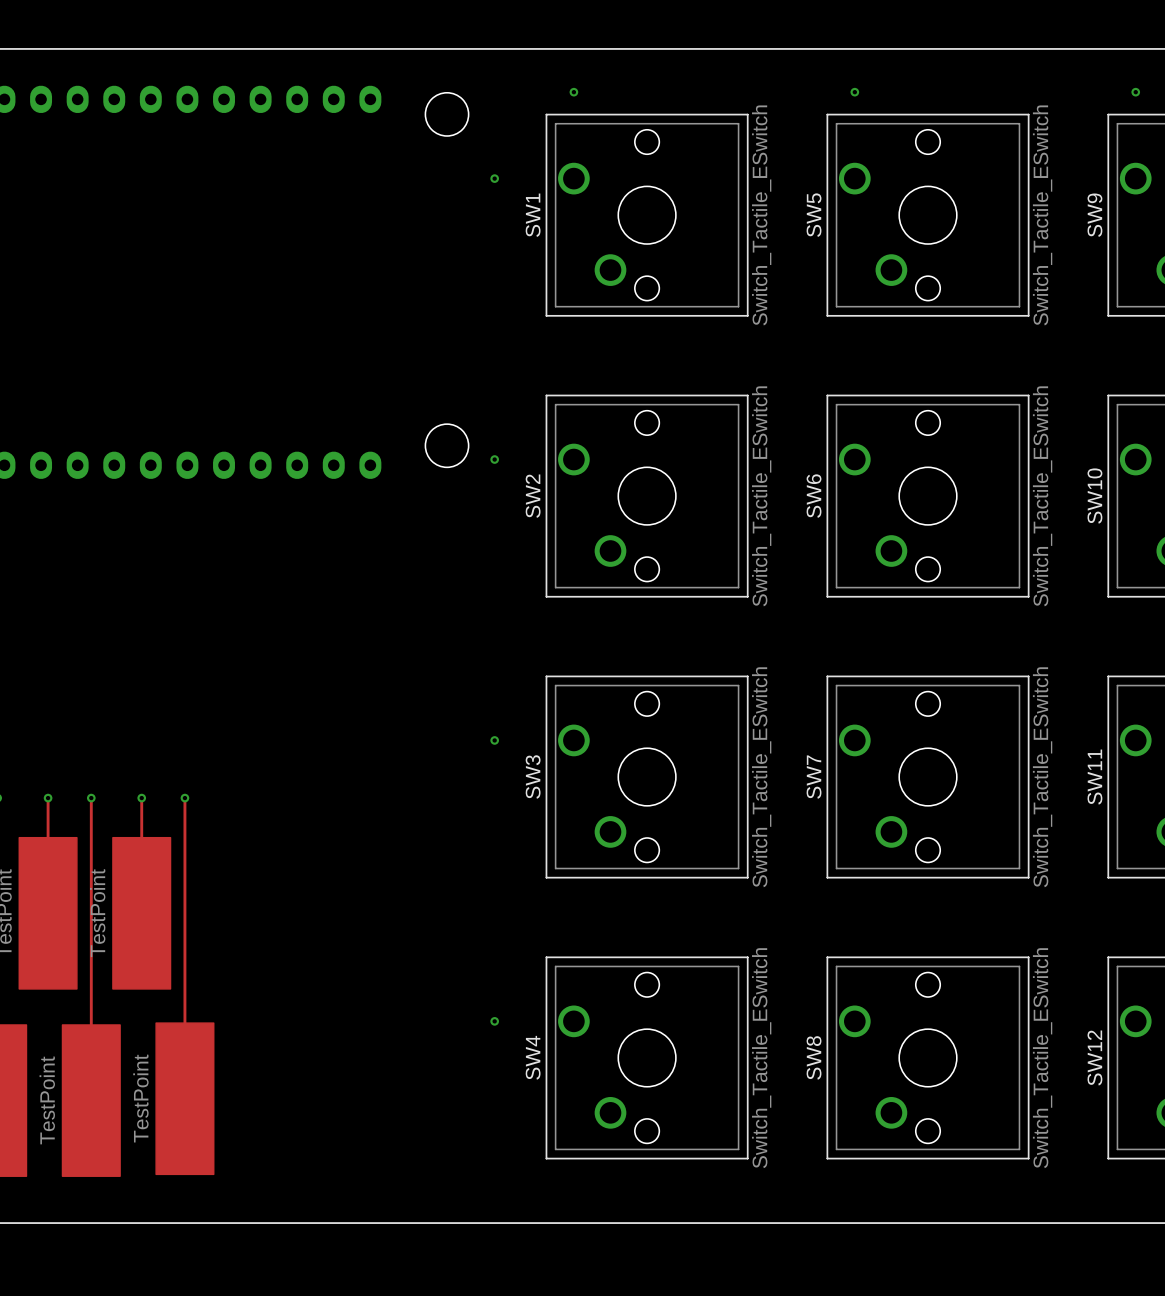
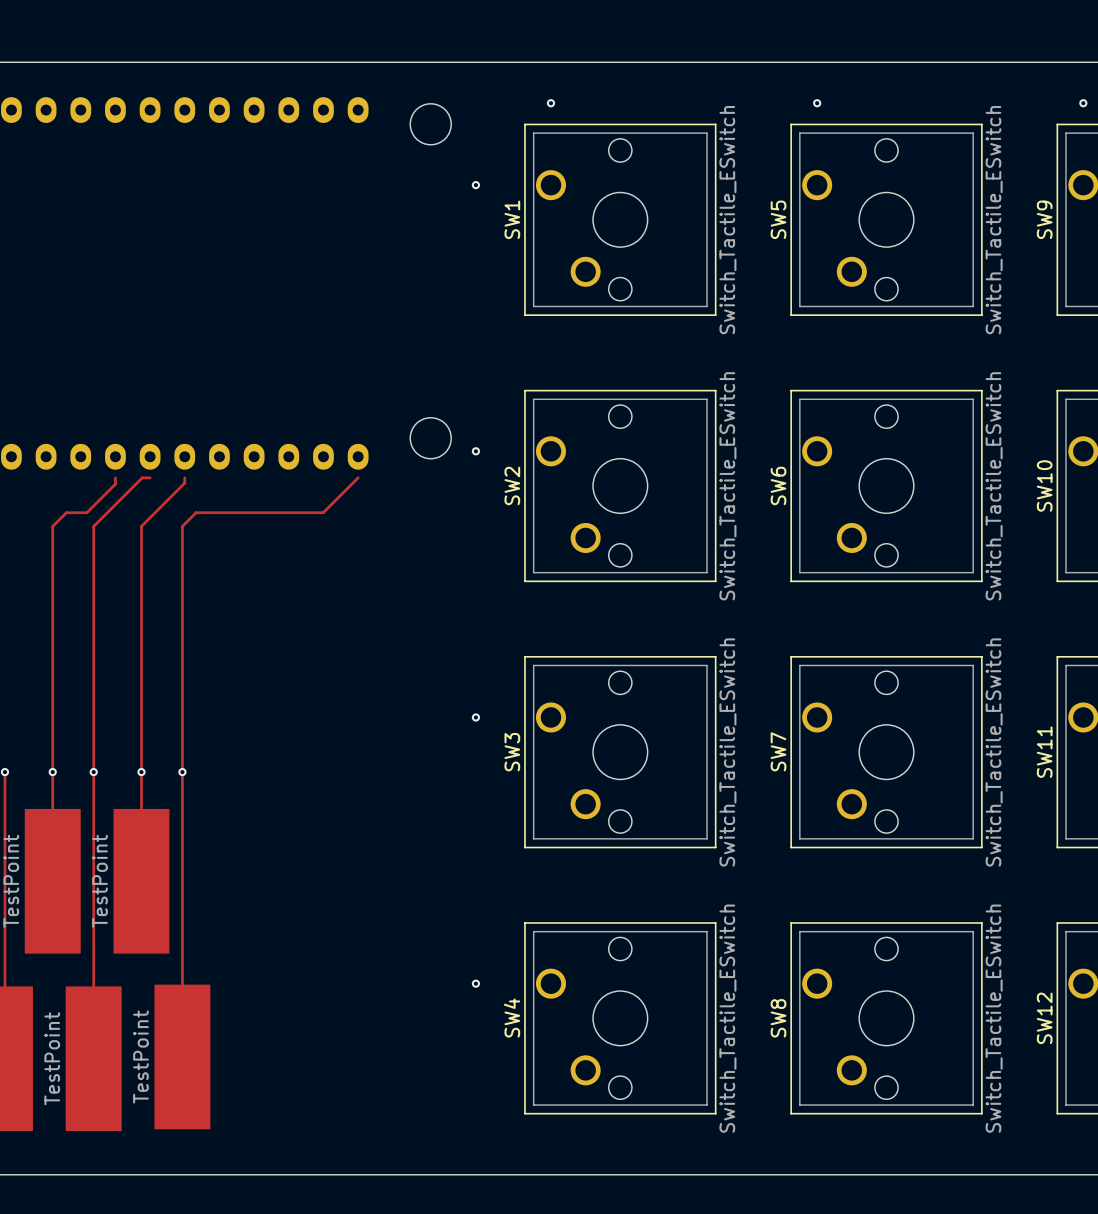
top track: none -> (115, 477) (115, 484) (86, 512) (66, 512) (52, 526) (52, 772)
top track: none -> (150, 477) (142, 477) (93, 526) (93, 772)
top track: none -> (184, 477) (184, 483) (141, 526) (141, 772)
top track: none -> (358, 477) (323, 512) (196, 512) (182, 526) (182, 772)

